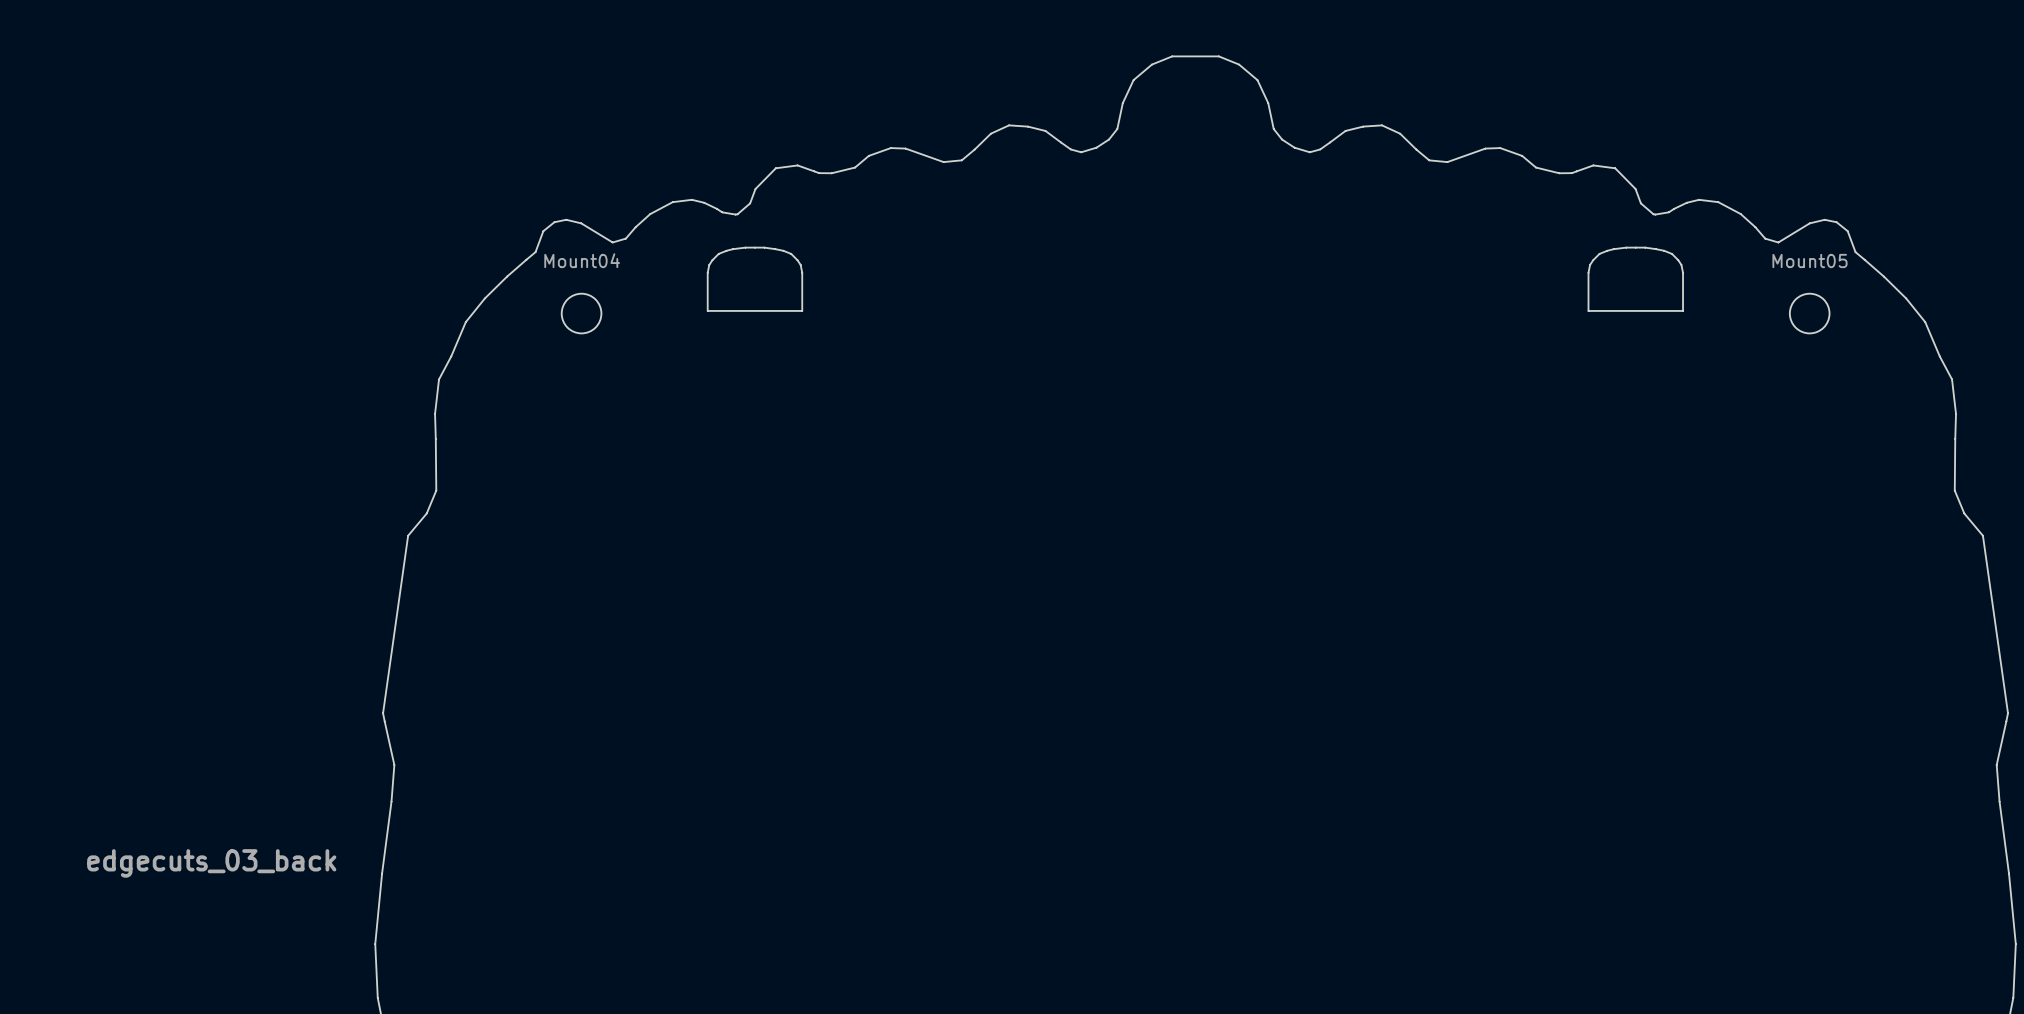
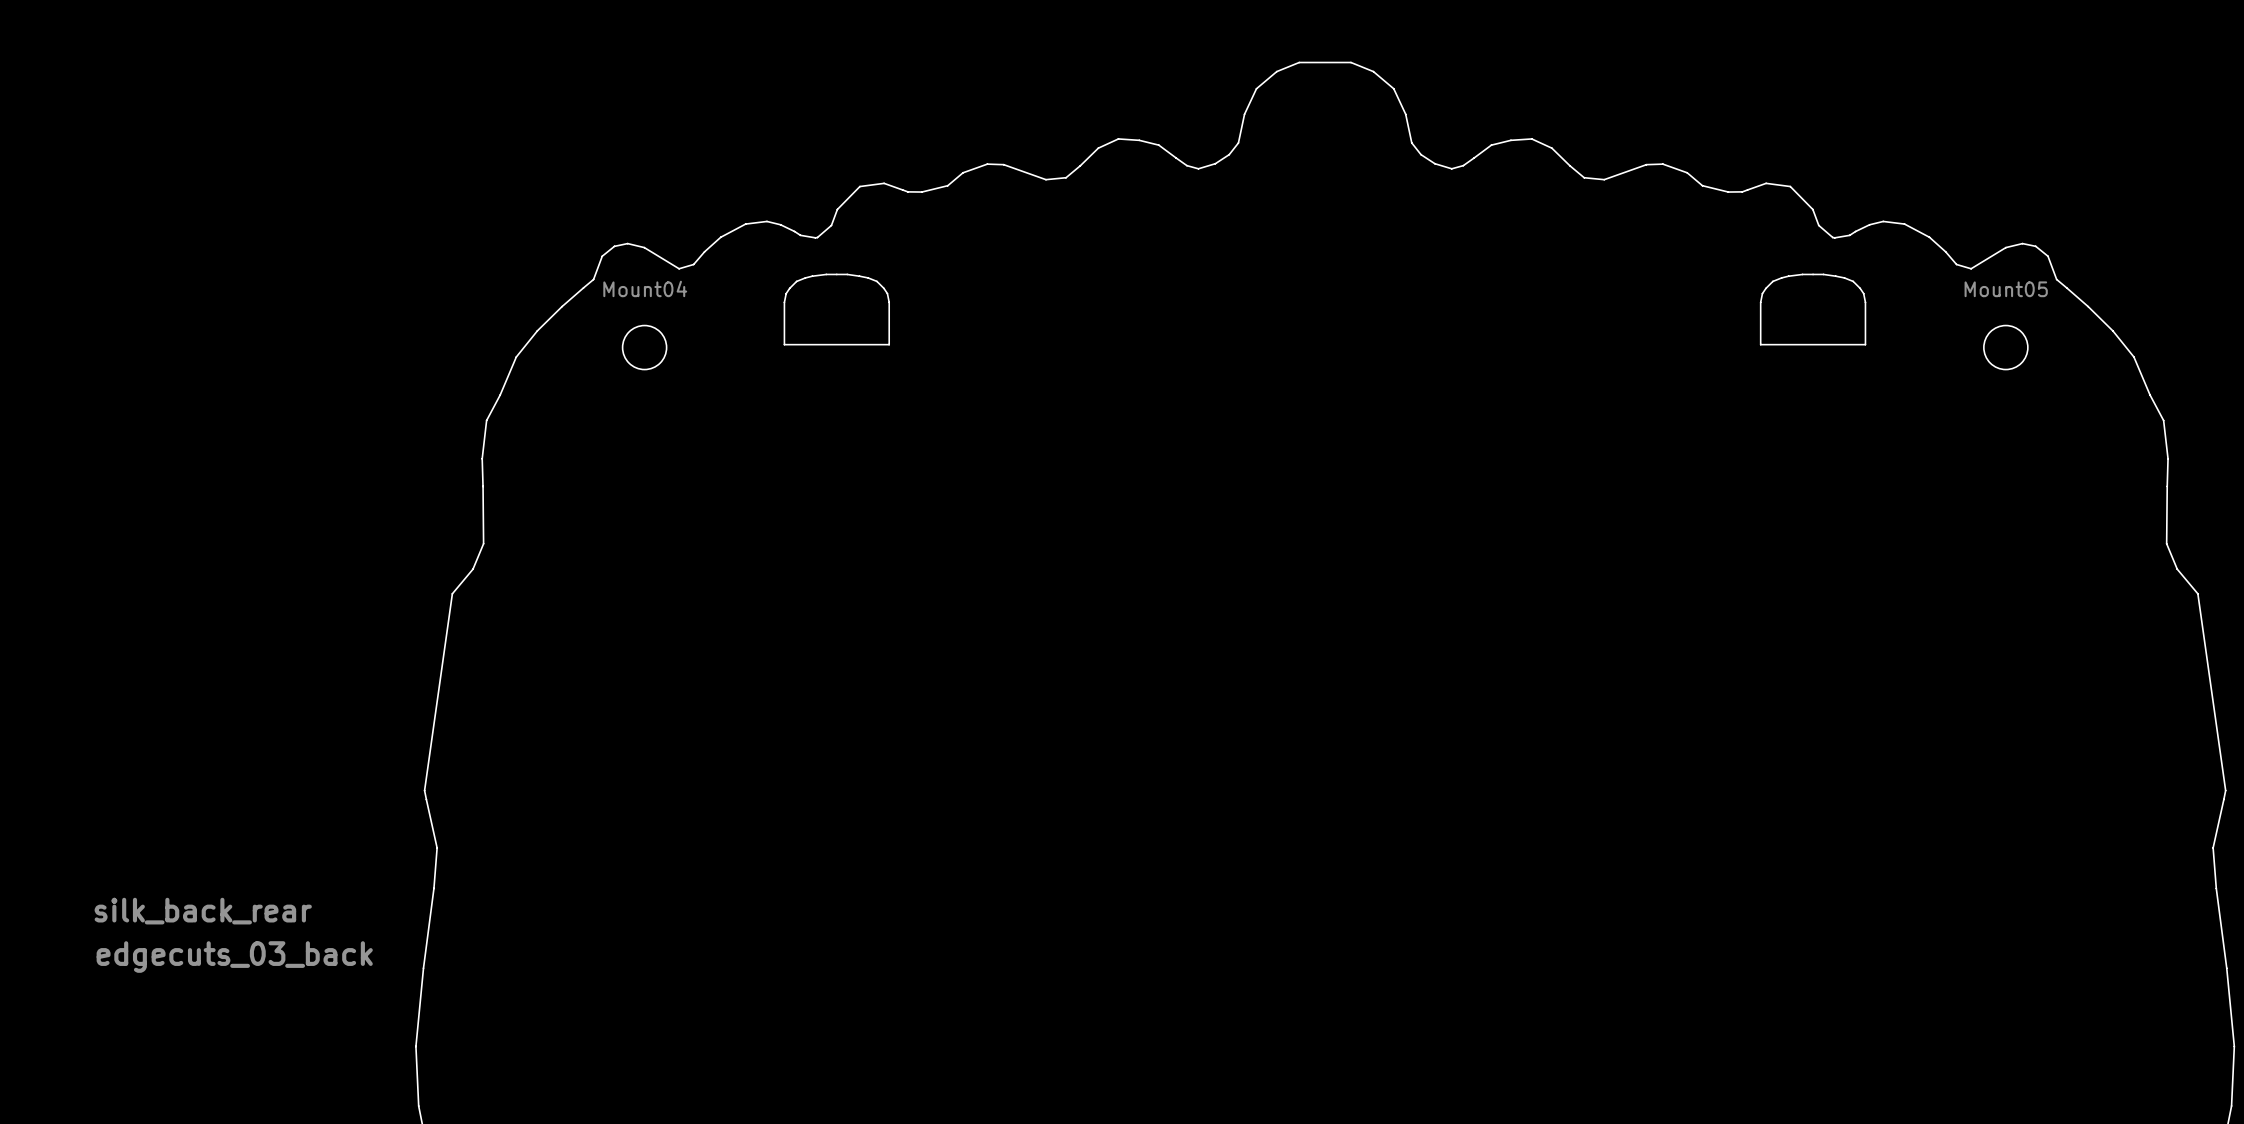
silk_back_rear: none -> (203, 911)

